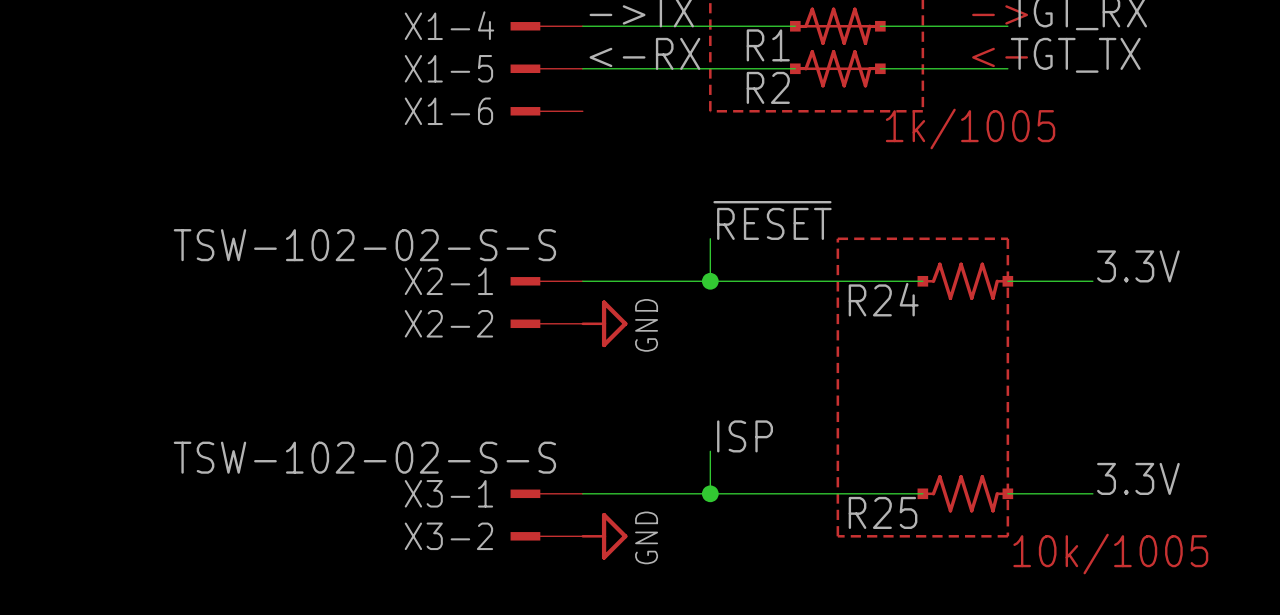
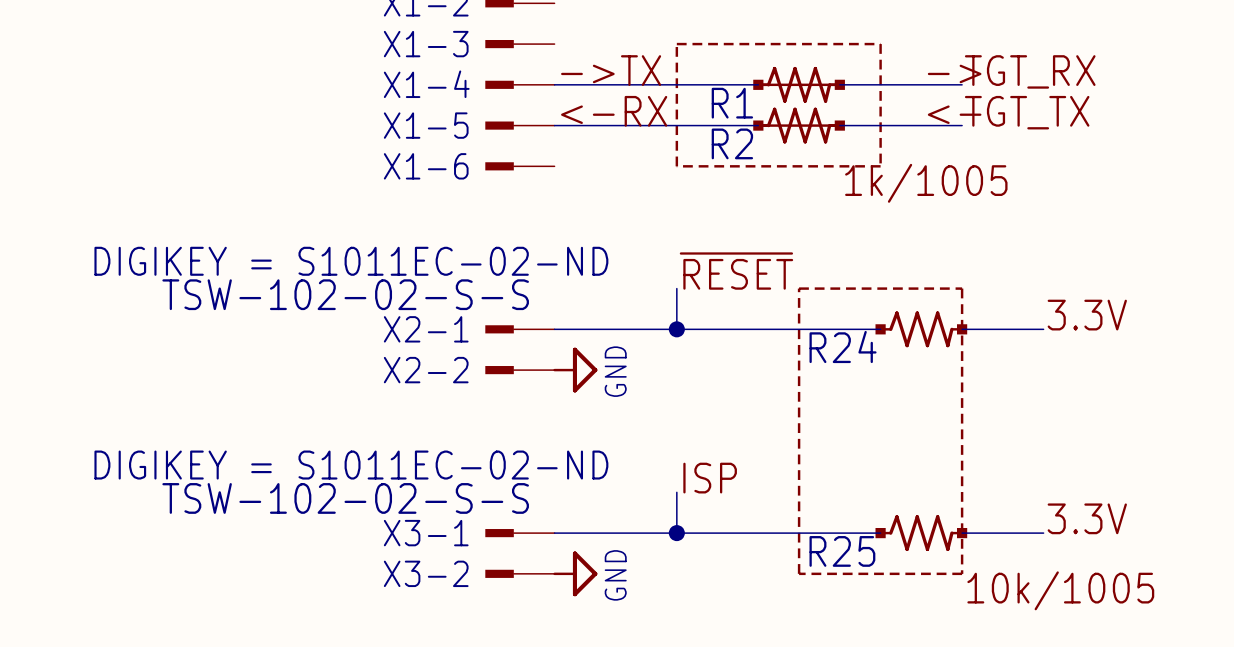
X2-1 text: none -> DIGIKEY = S1011EC-02-ND (351, 261)
X3-1 text: none -> DIGIKEY = S1011EC-02-ND (351, 465)

